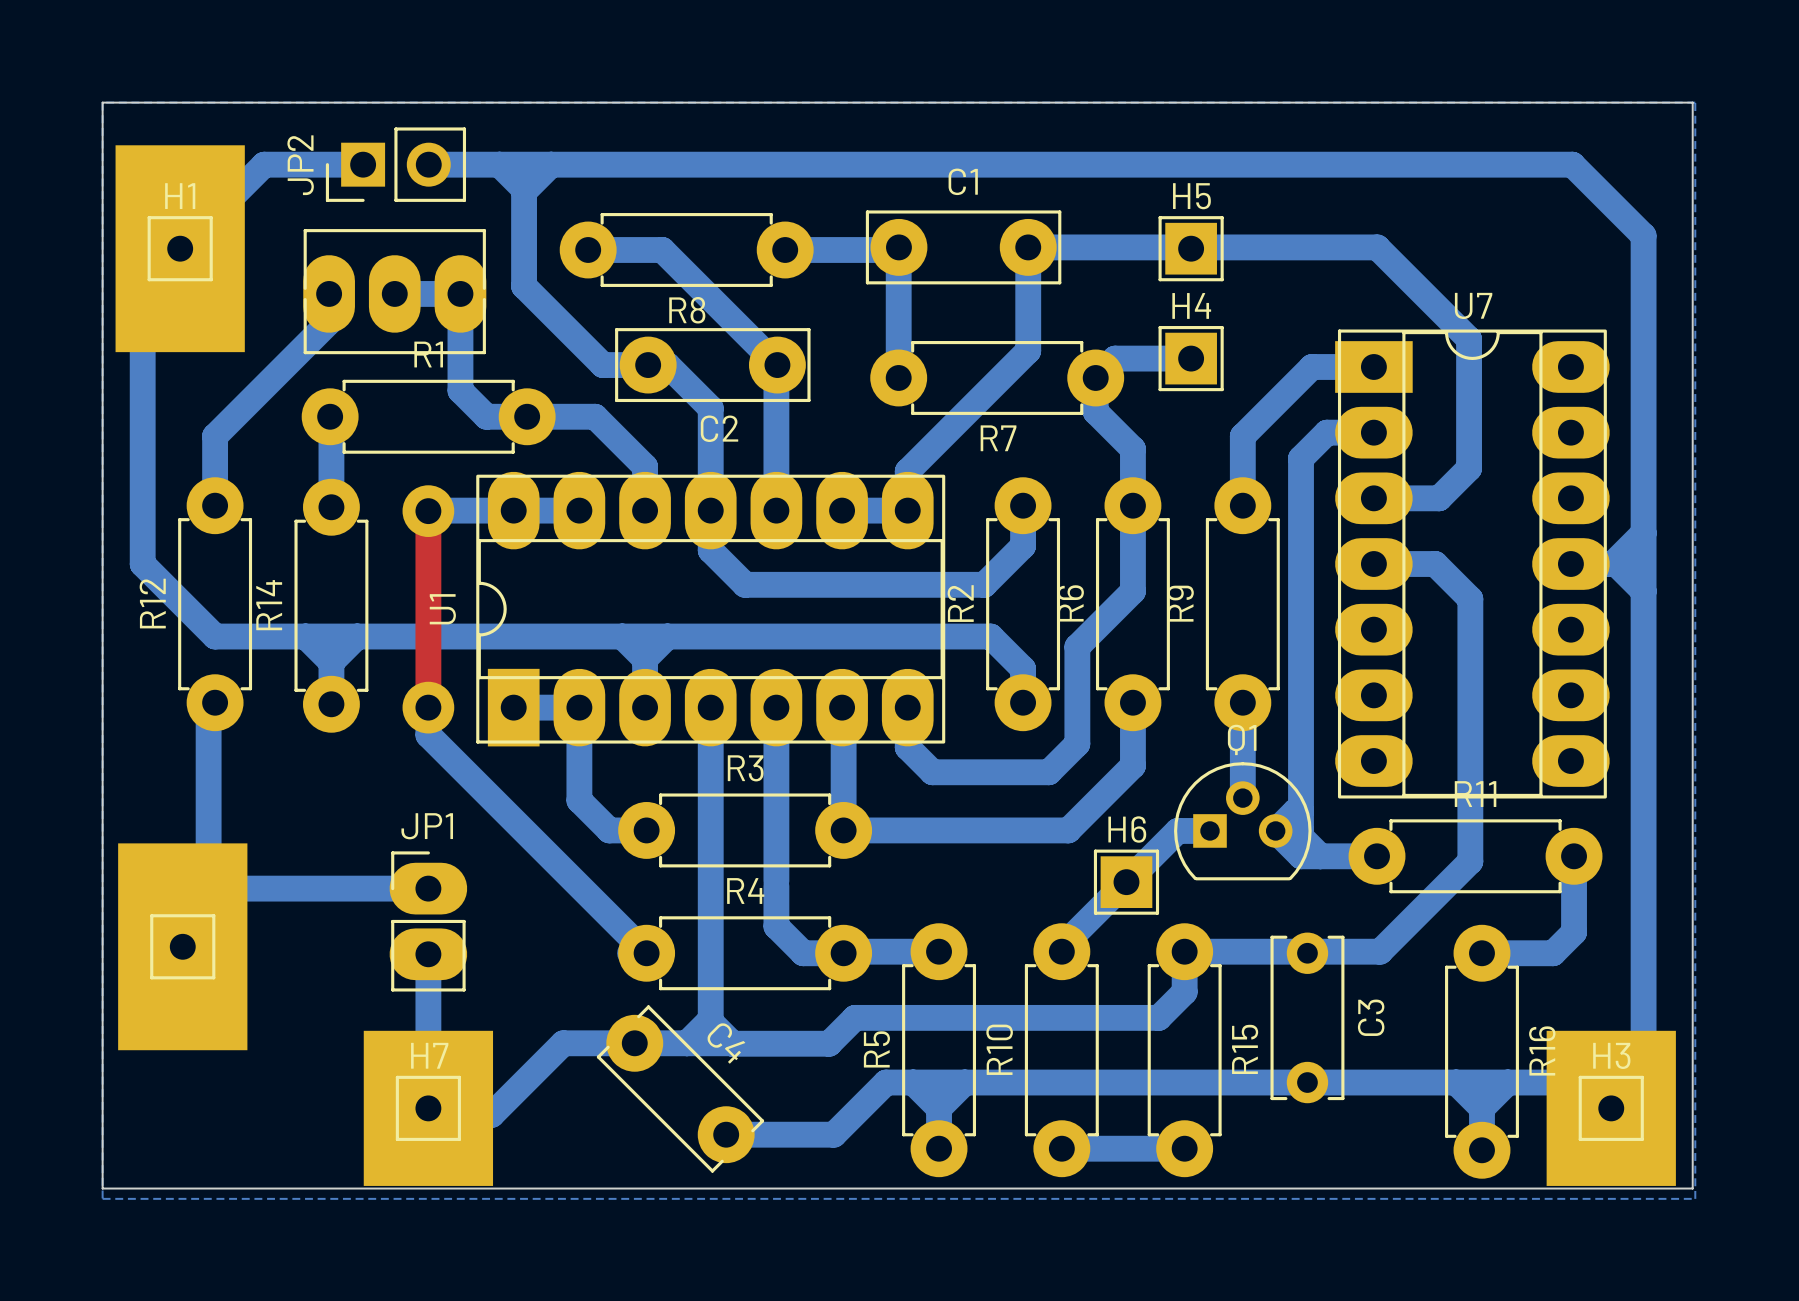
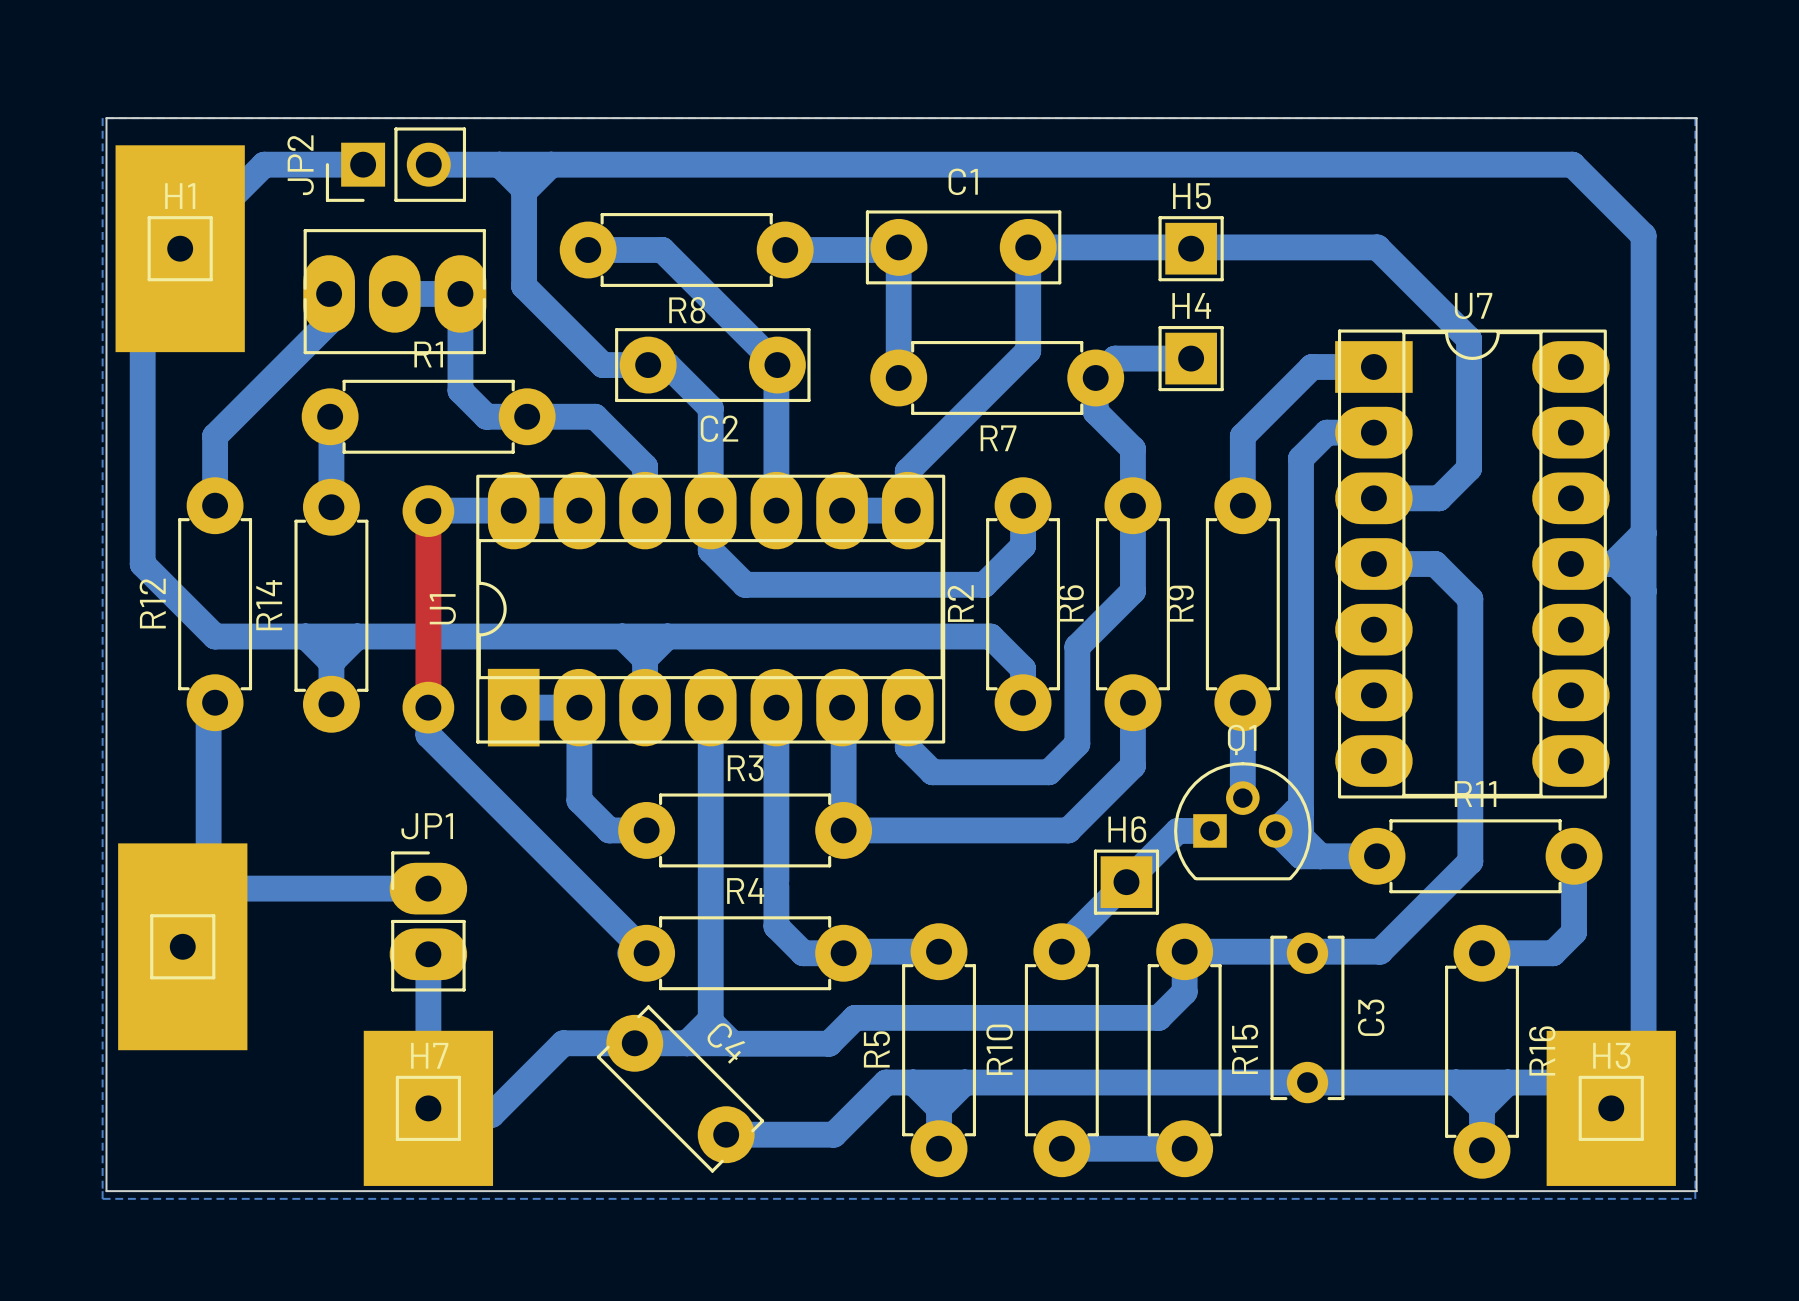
board edge: (102, 102) (1692, 102) (1692, 1188) (102, 1188) (102, 102) -> (106, 118) (106, 1191) (1696, 1191) (1696, 118) (106, 118)

